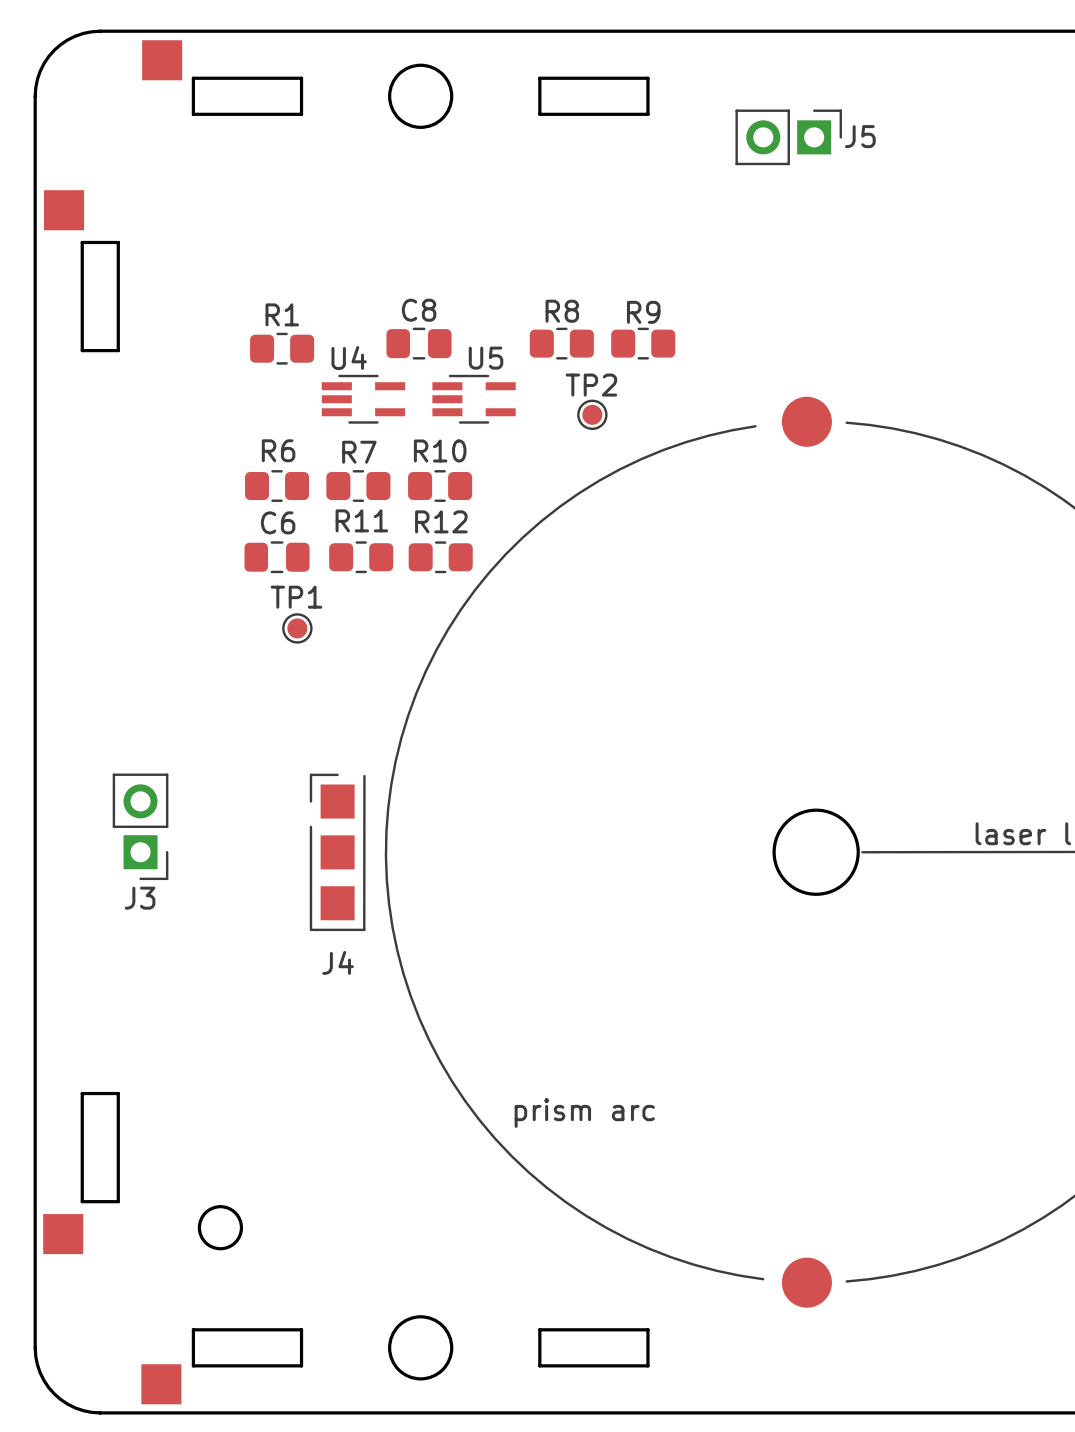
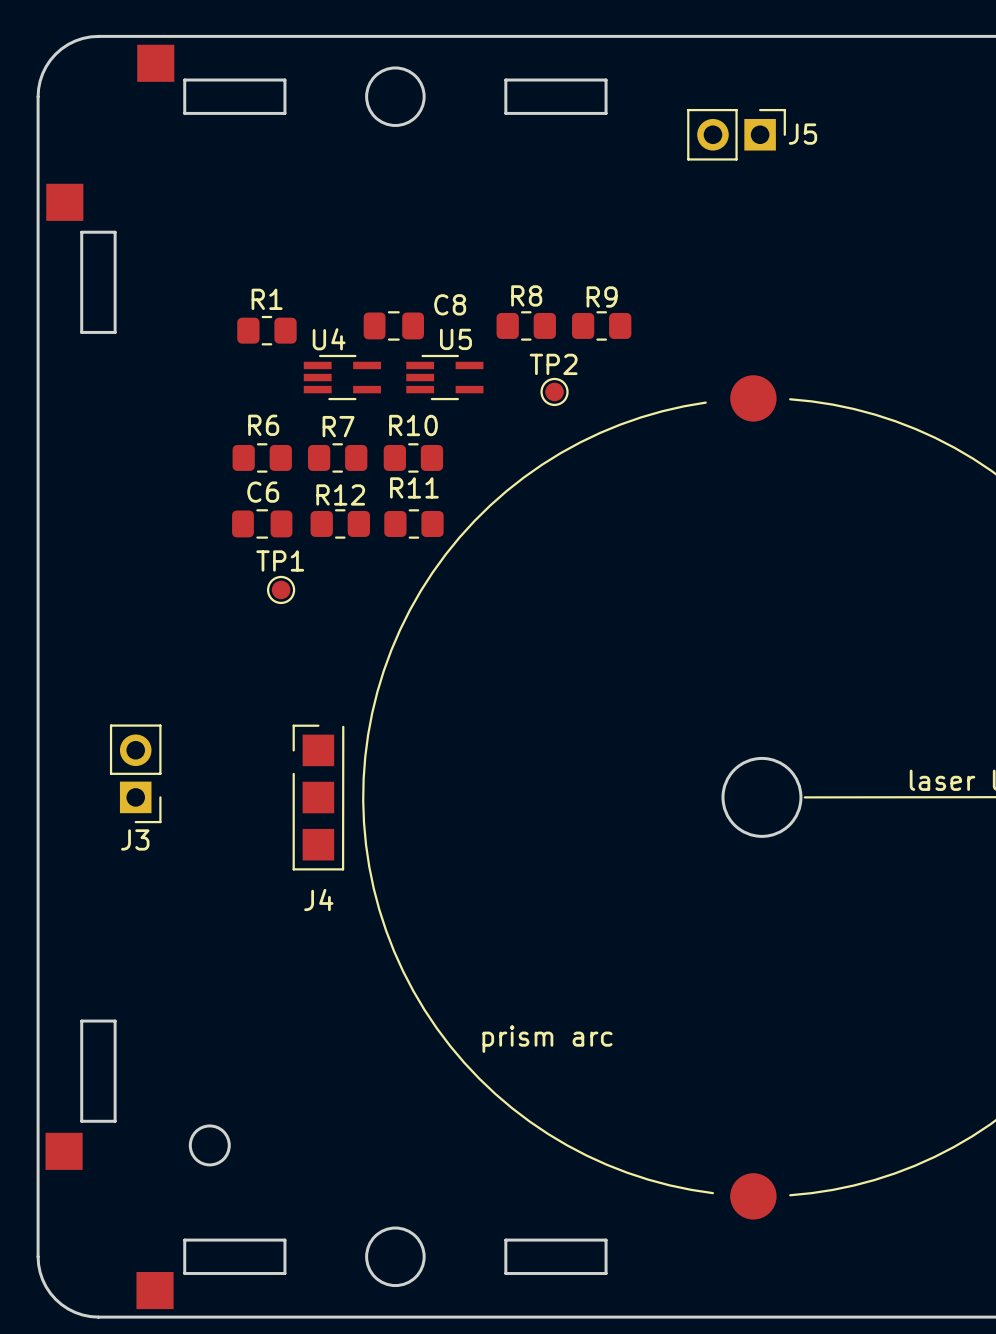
C8 name position: C8 (419, 310) -> C8 (450, 304)
R11 name: R11 (361, 520) -> R12 (340, 494)
R12 name: R12 (441, 521) -> R11 (414, 487)

